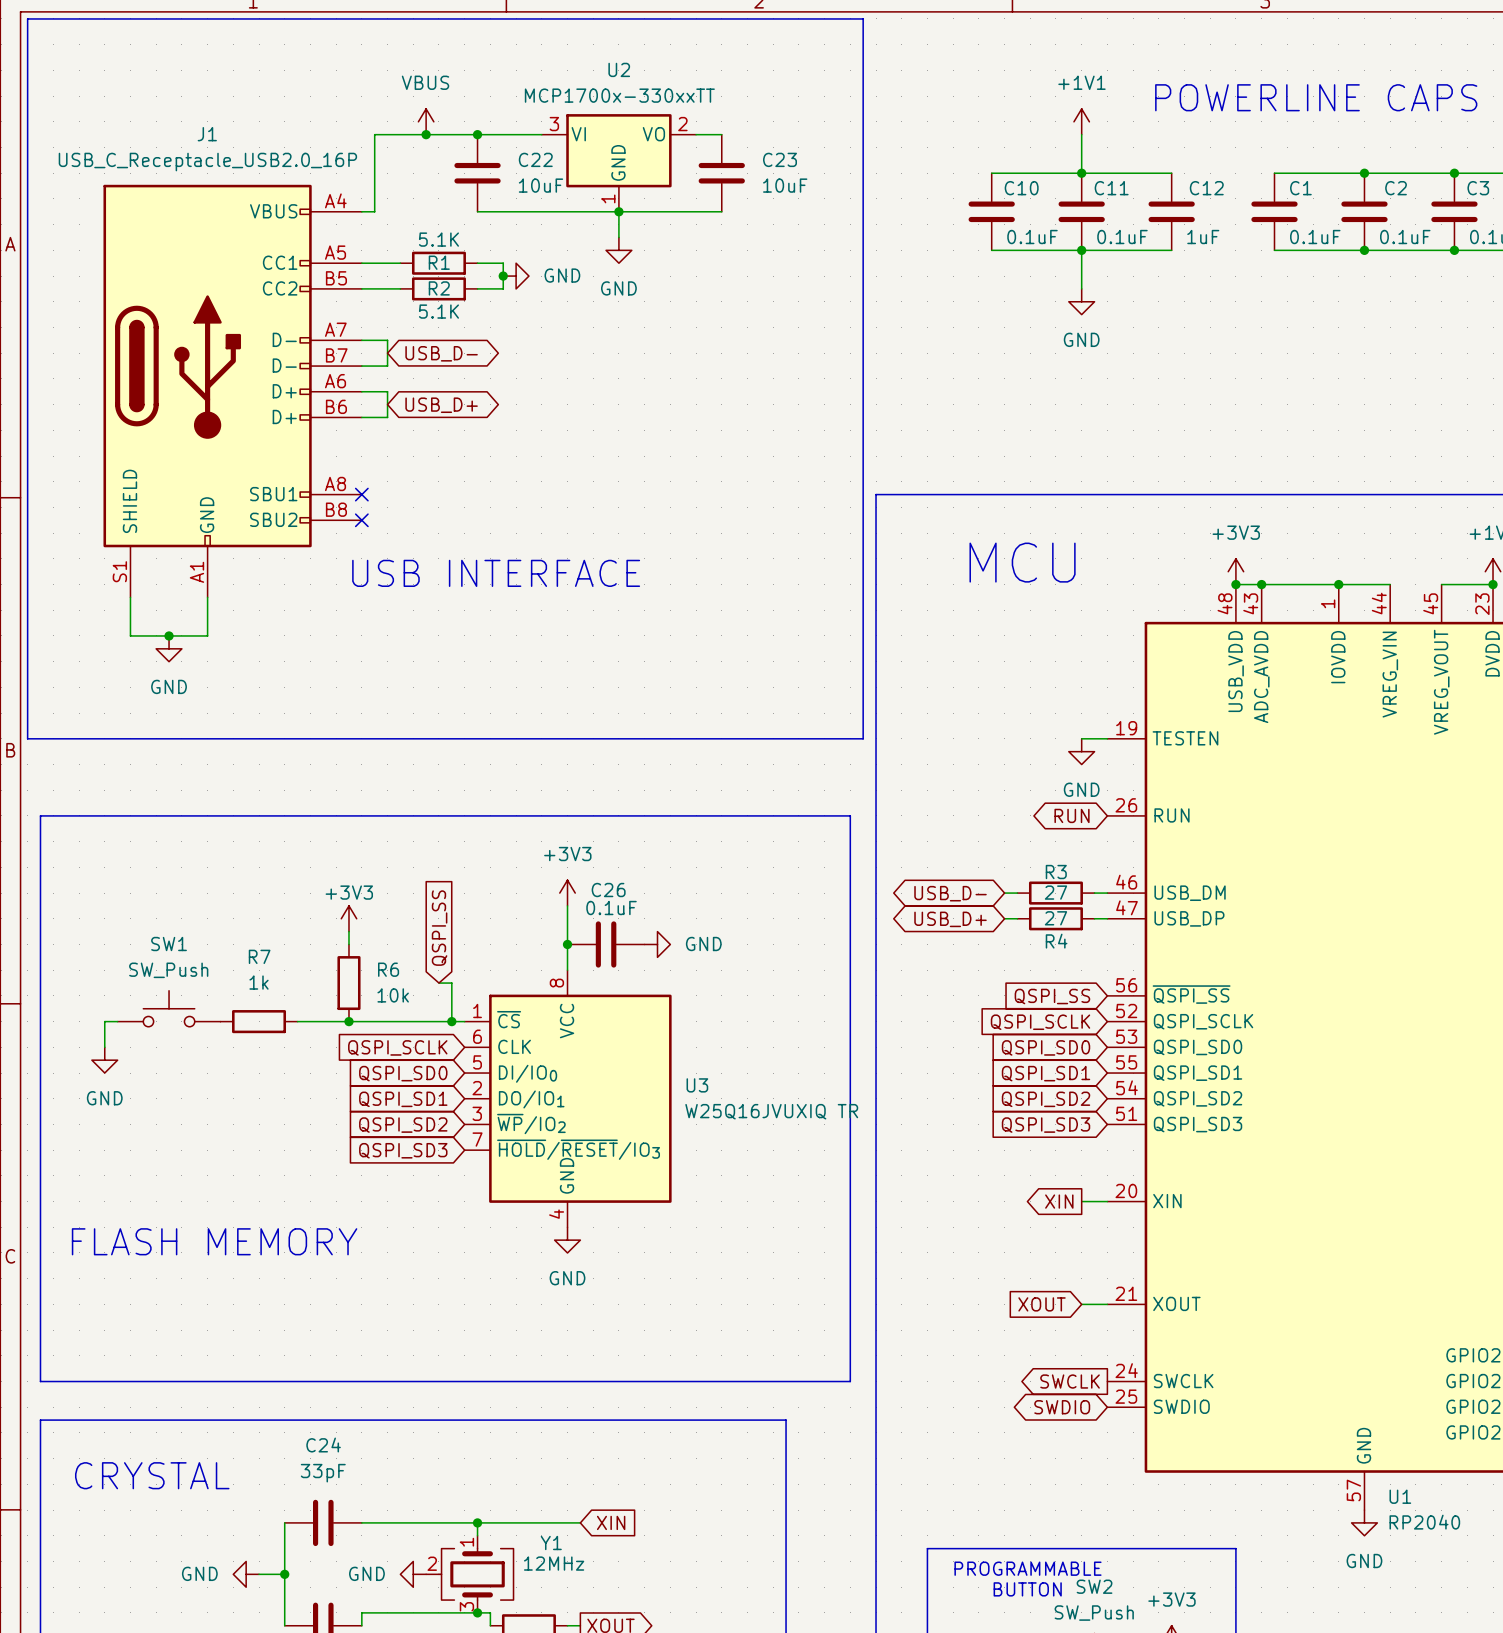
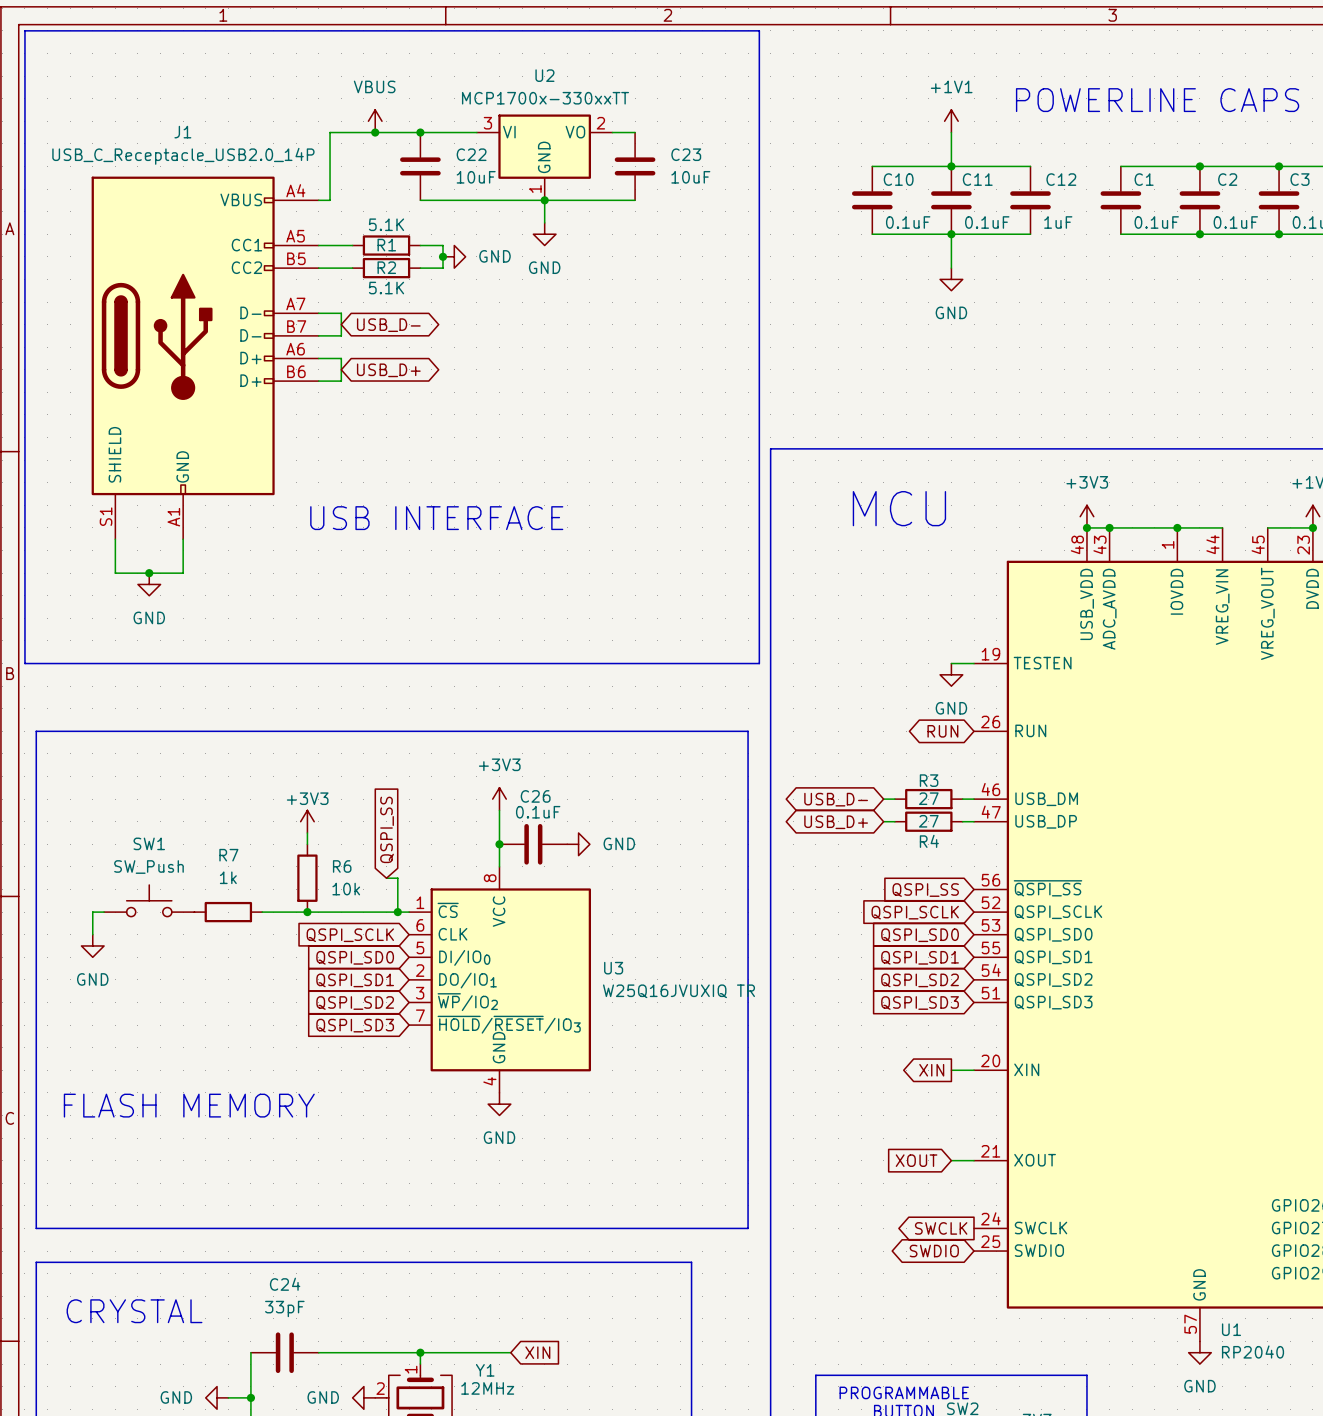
J1 value: USB_C_Receptacle_USB2.0_16P (207, 162) -> USB_C_Receptacle_USB2.0_14P (183, 156)
J1 symbol: [103, 184, 362, 598] -> [91, 176, 319, 540]
no-connect mark: (361, 494) -> none
no-connect mark: (361, 520) -> none

